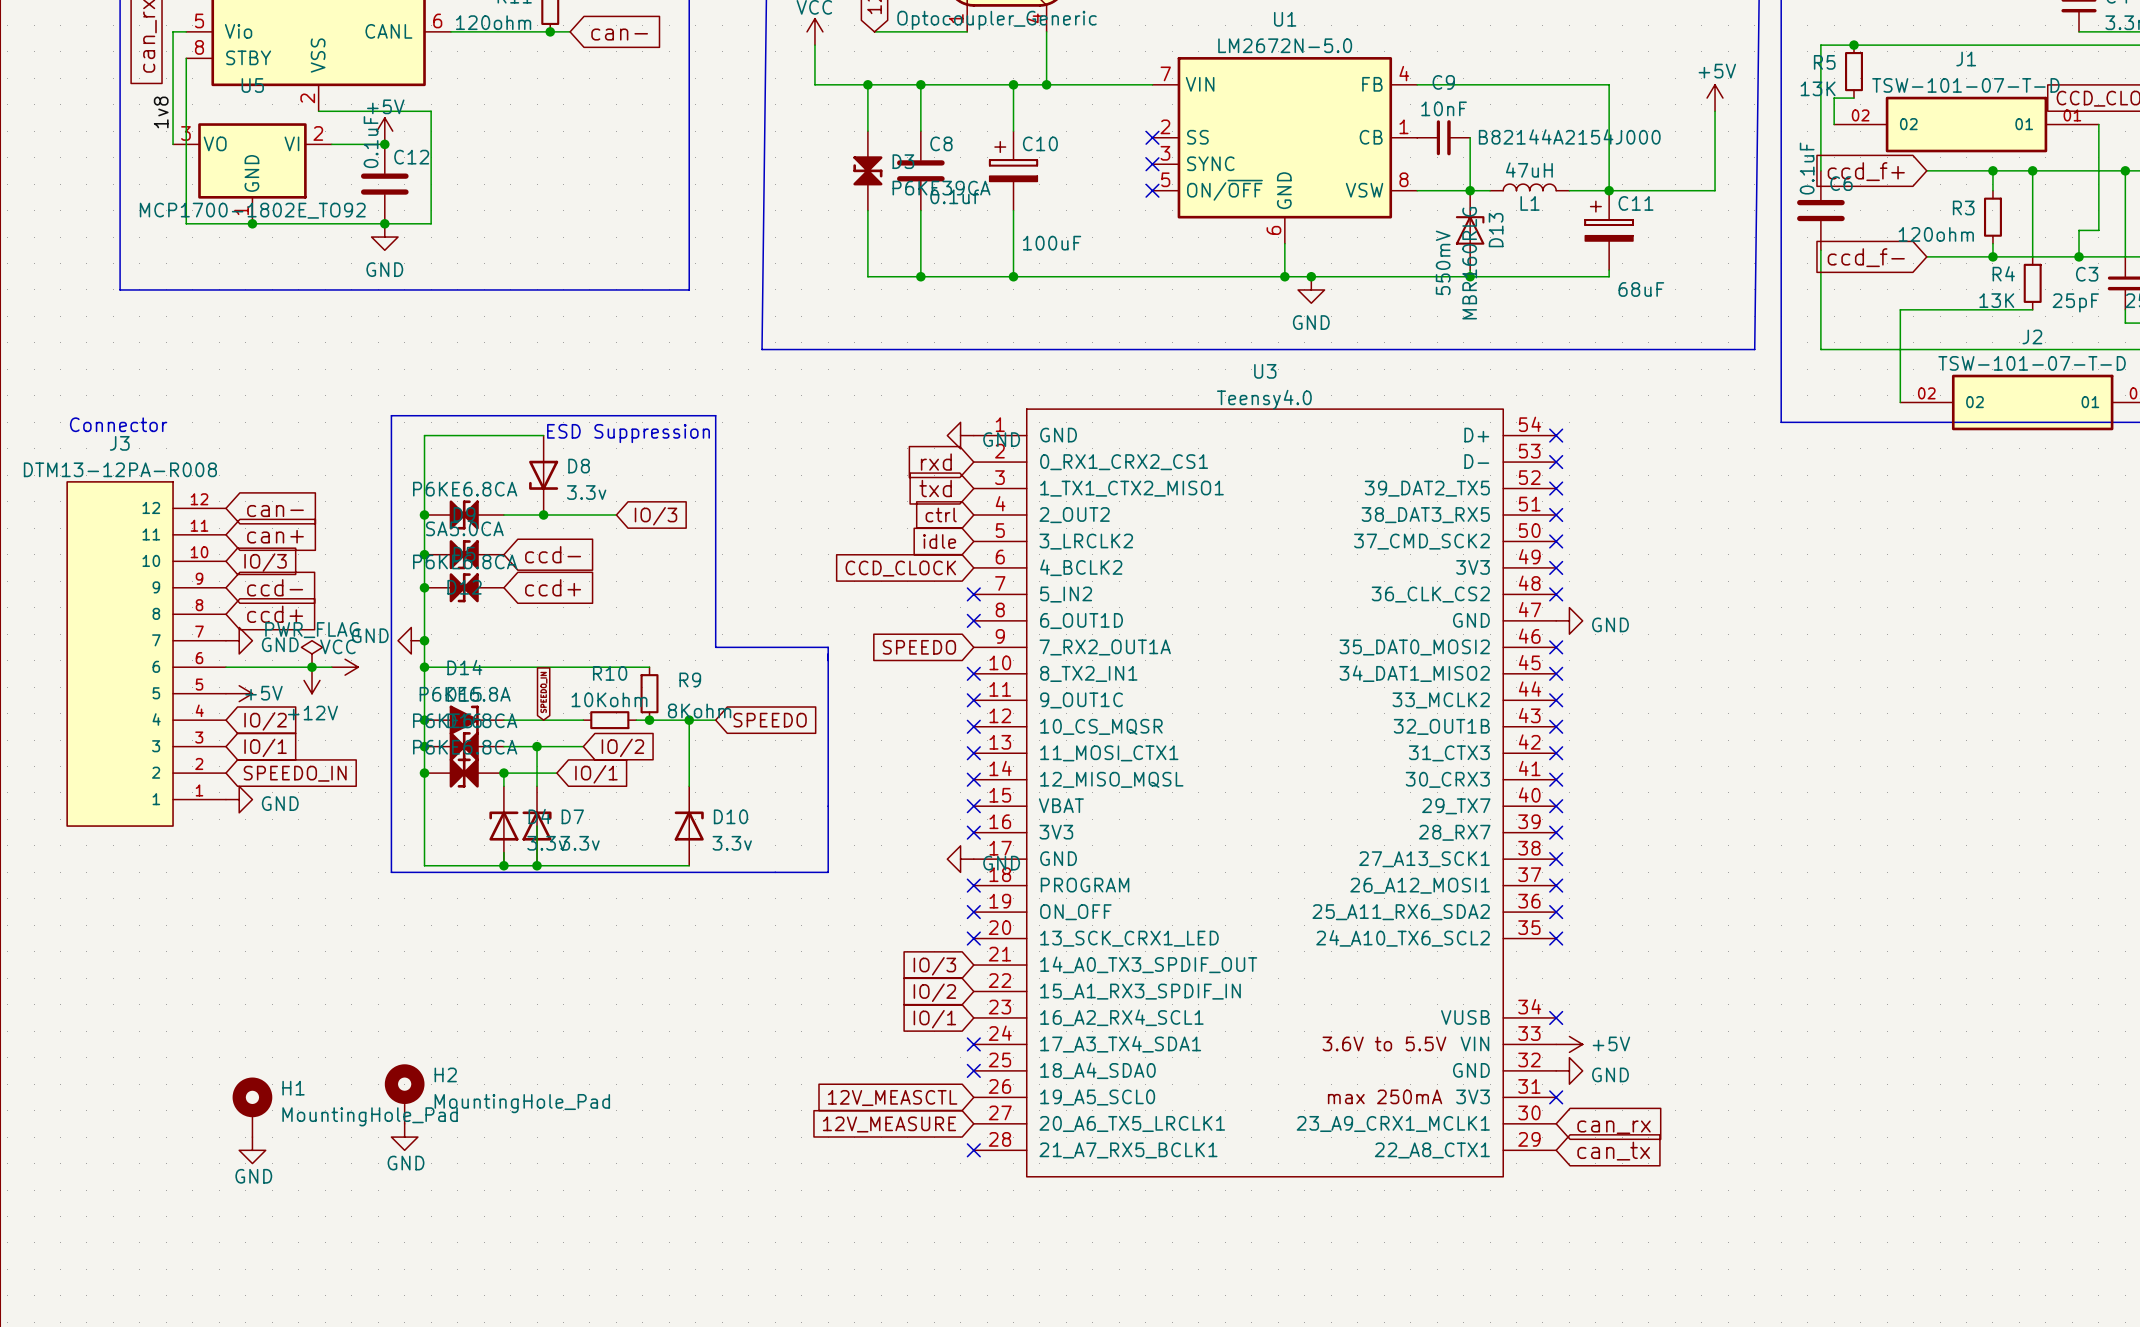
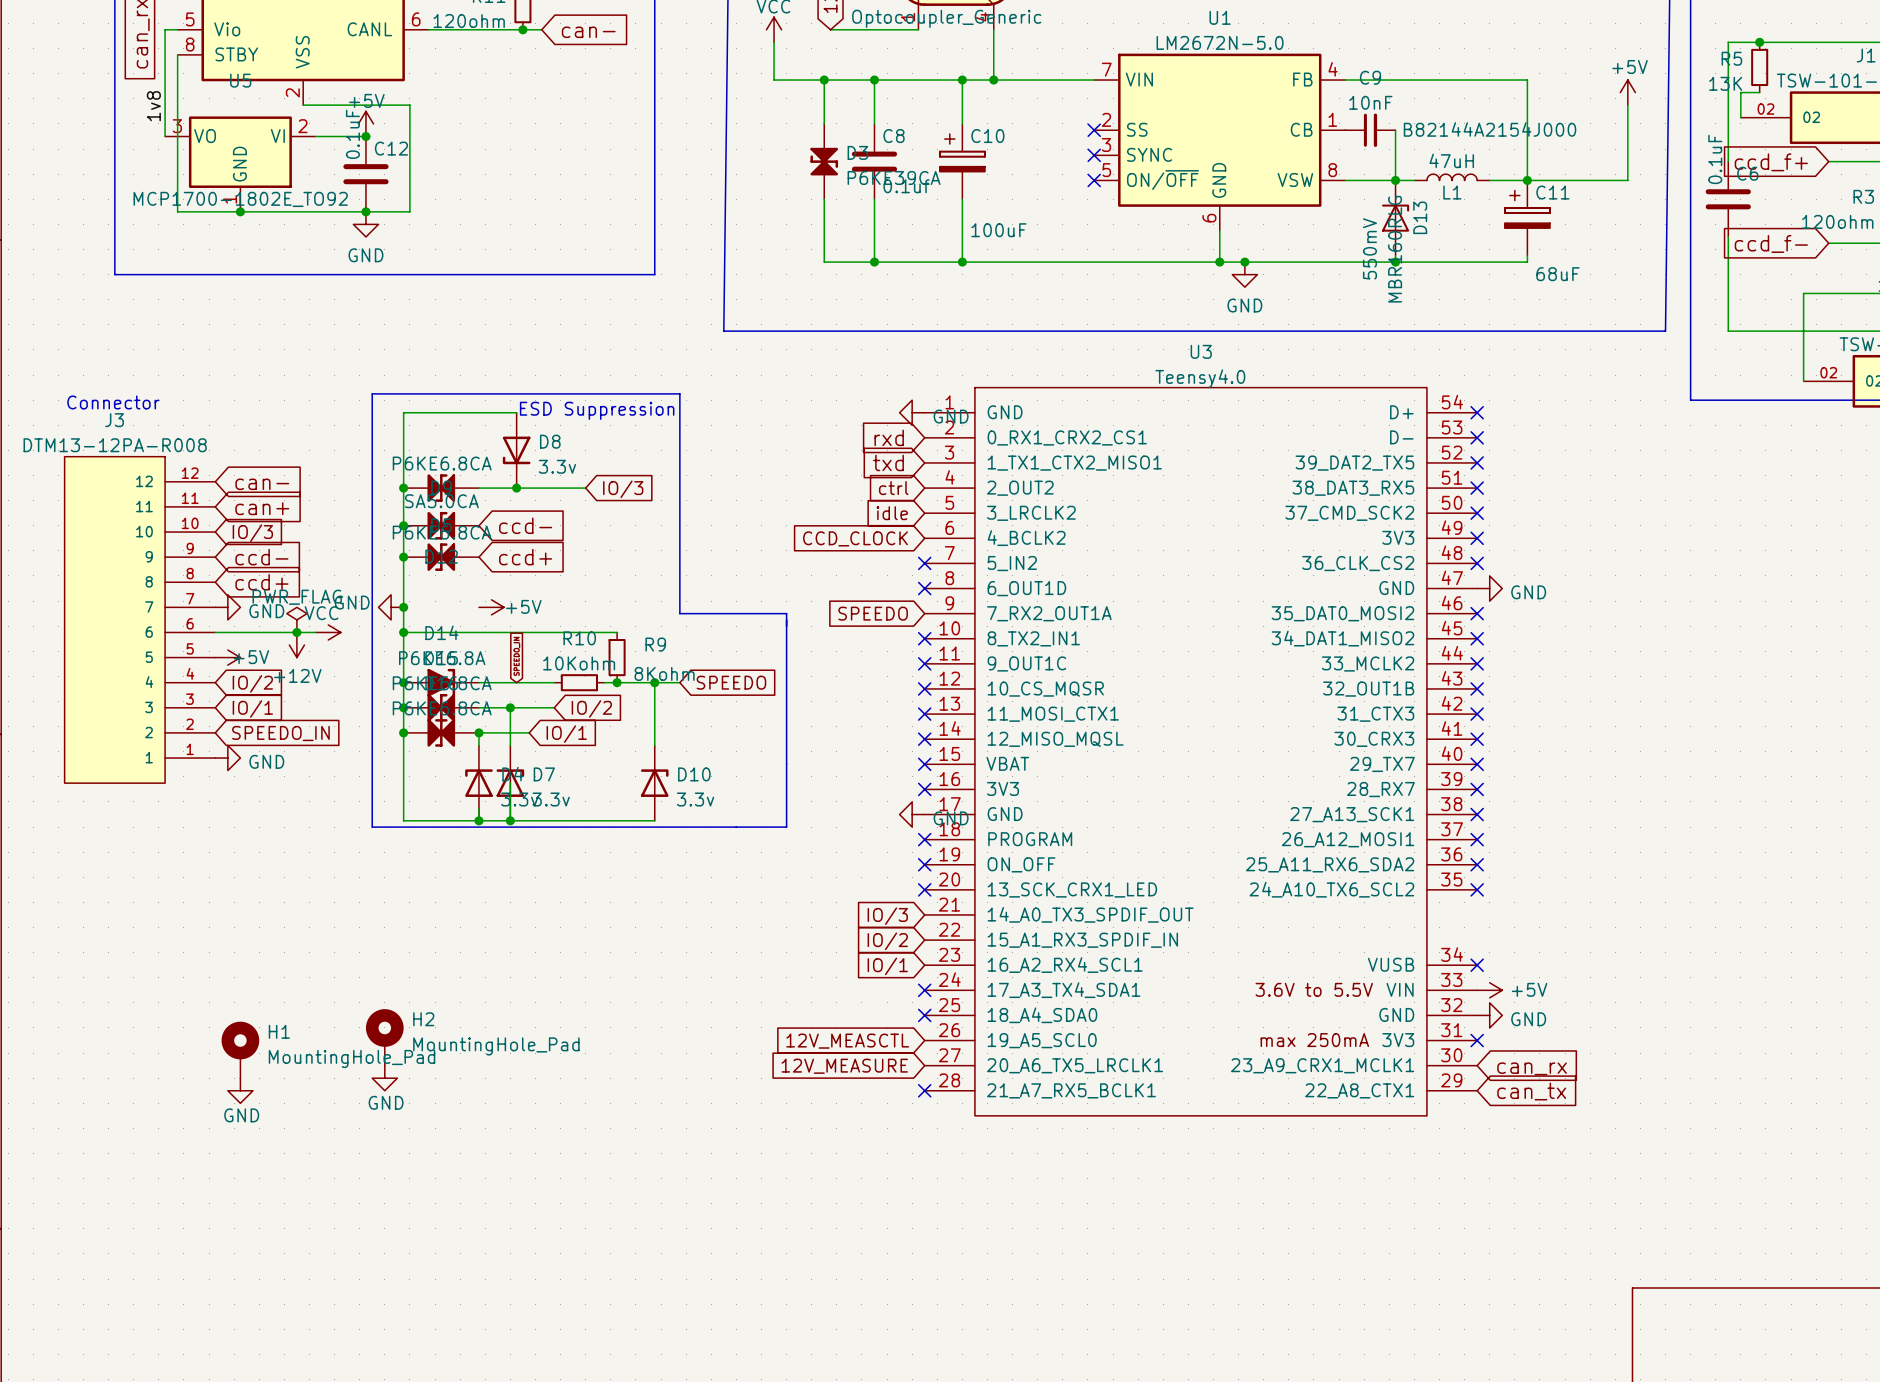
power symbol: none -> +5V (491, 607)

